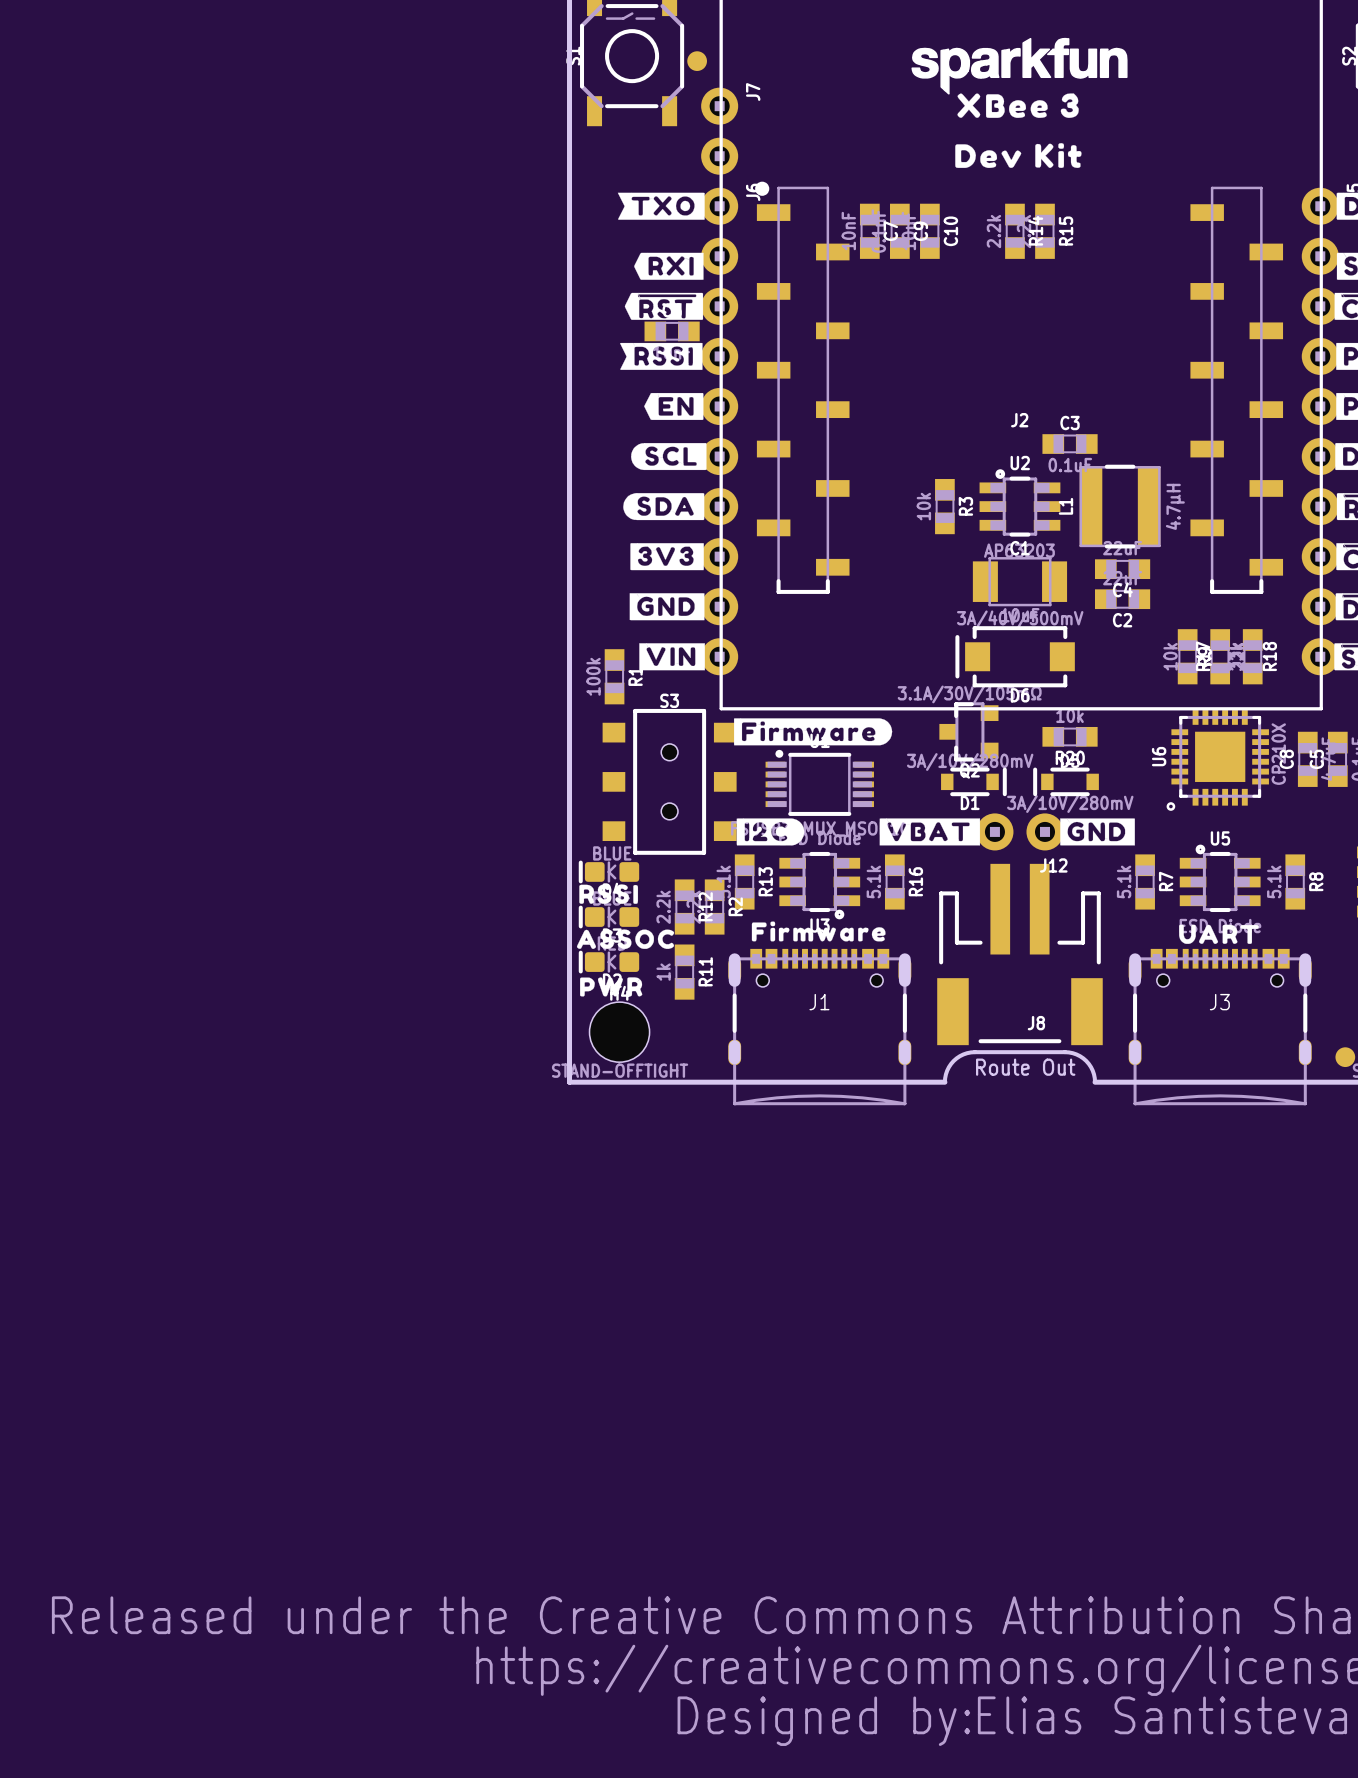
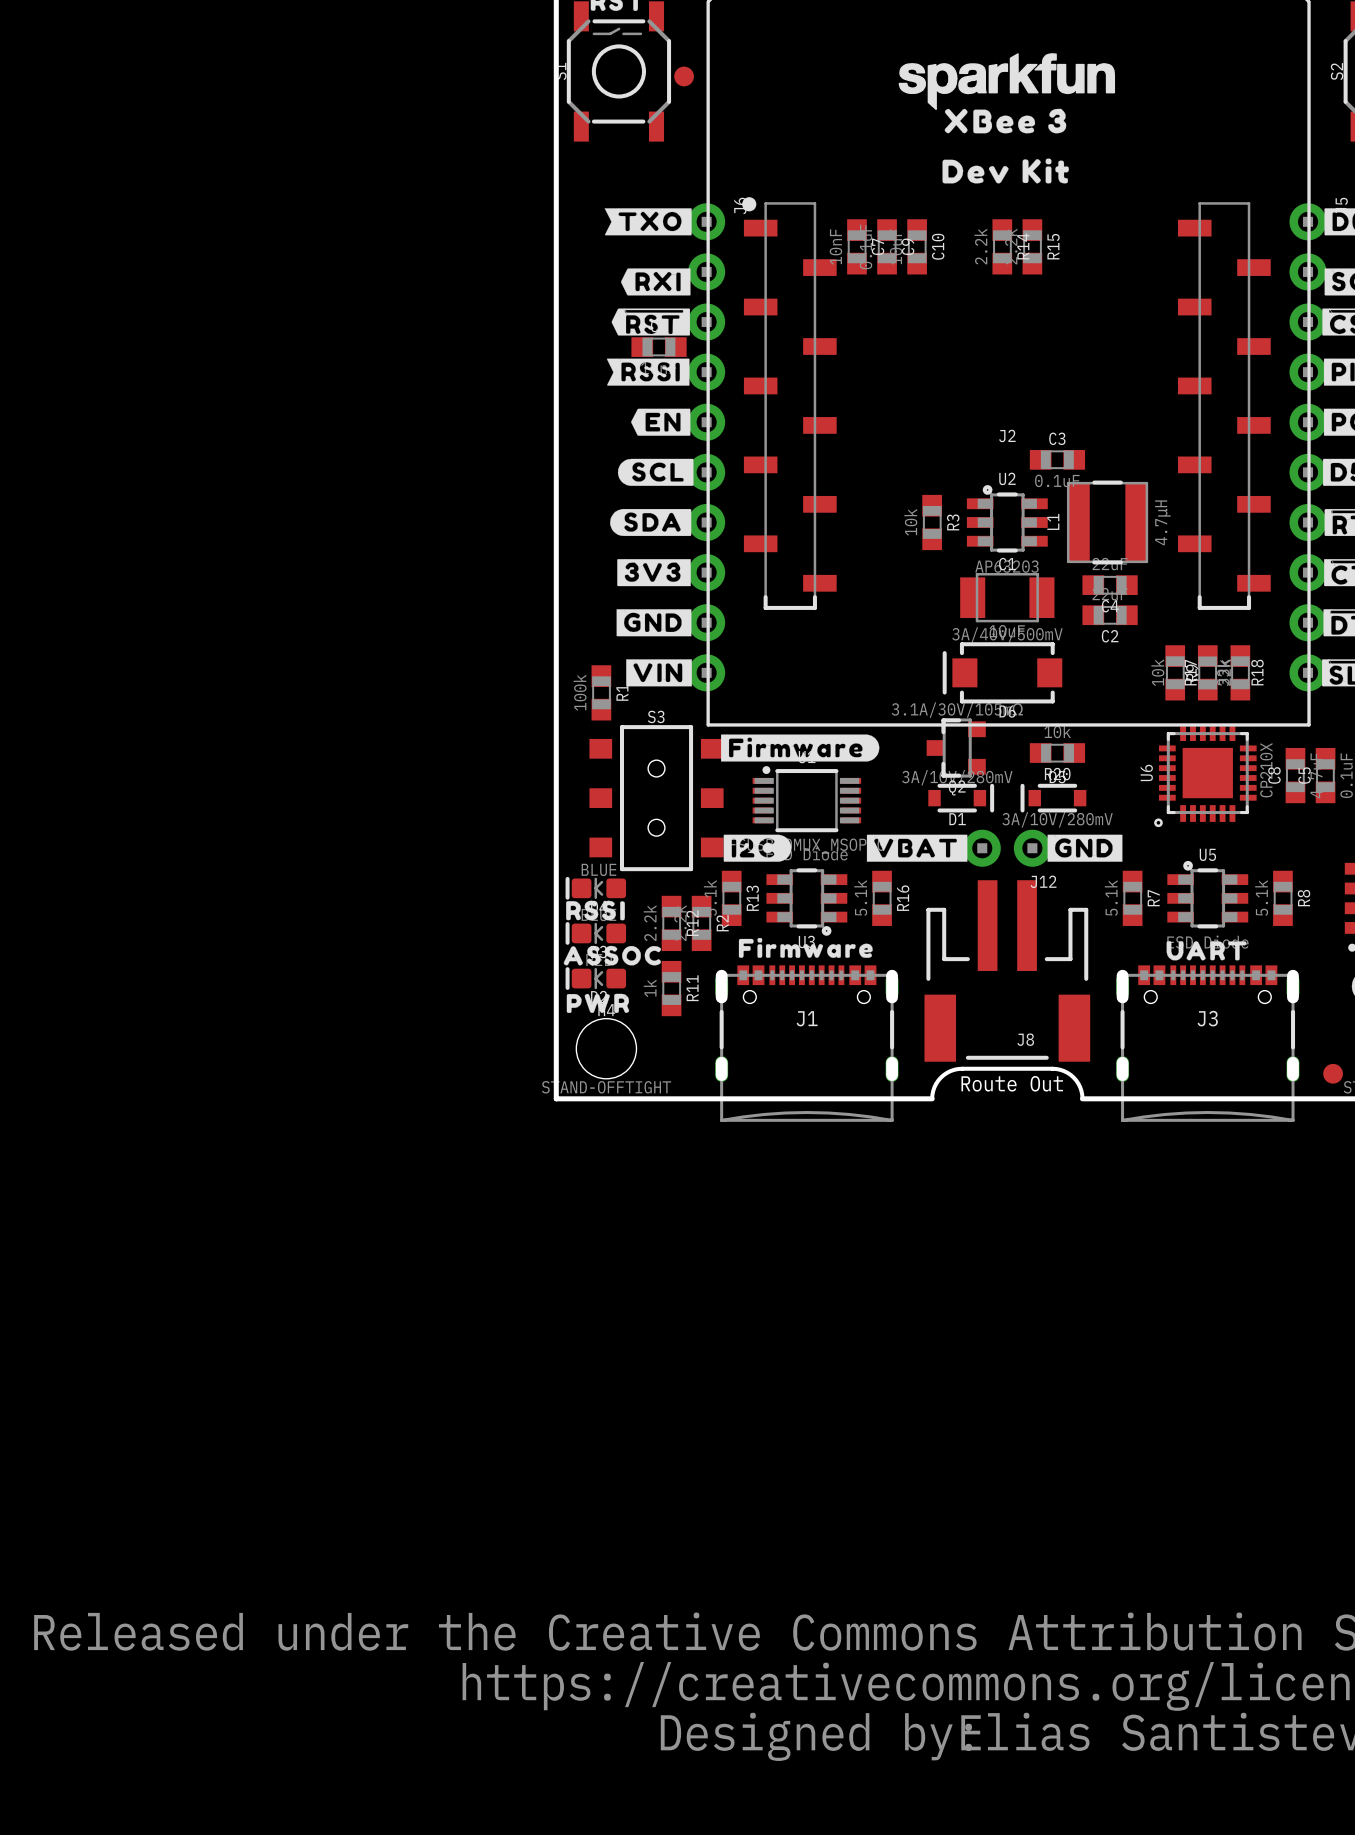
J7: (719, 131) -> none

